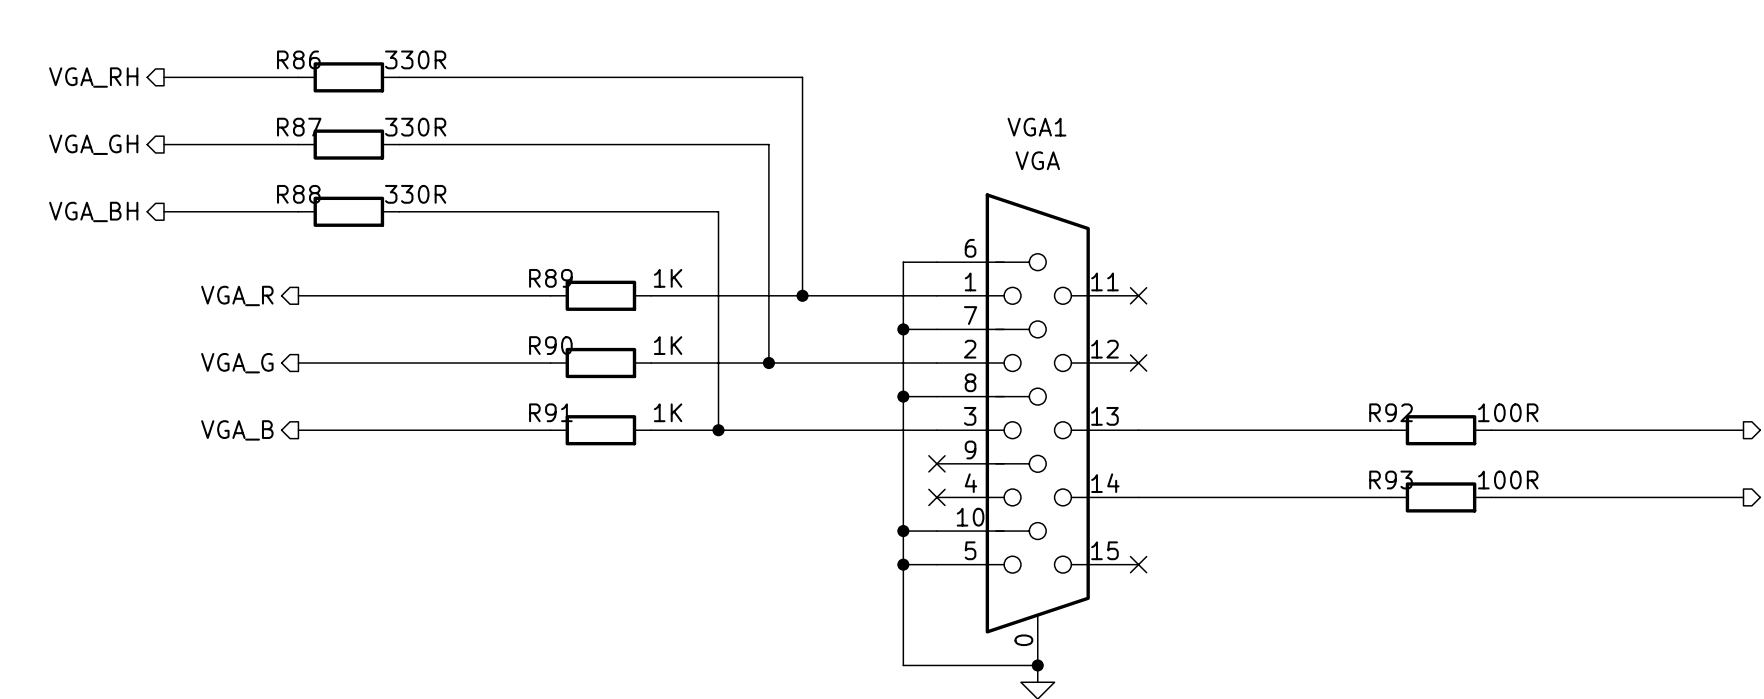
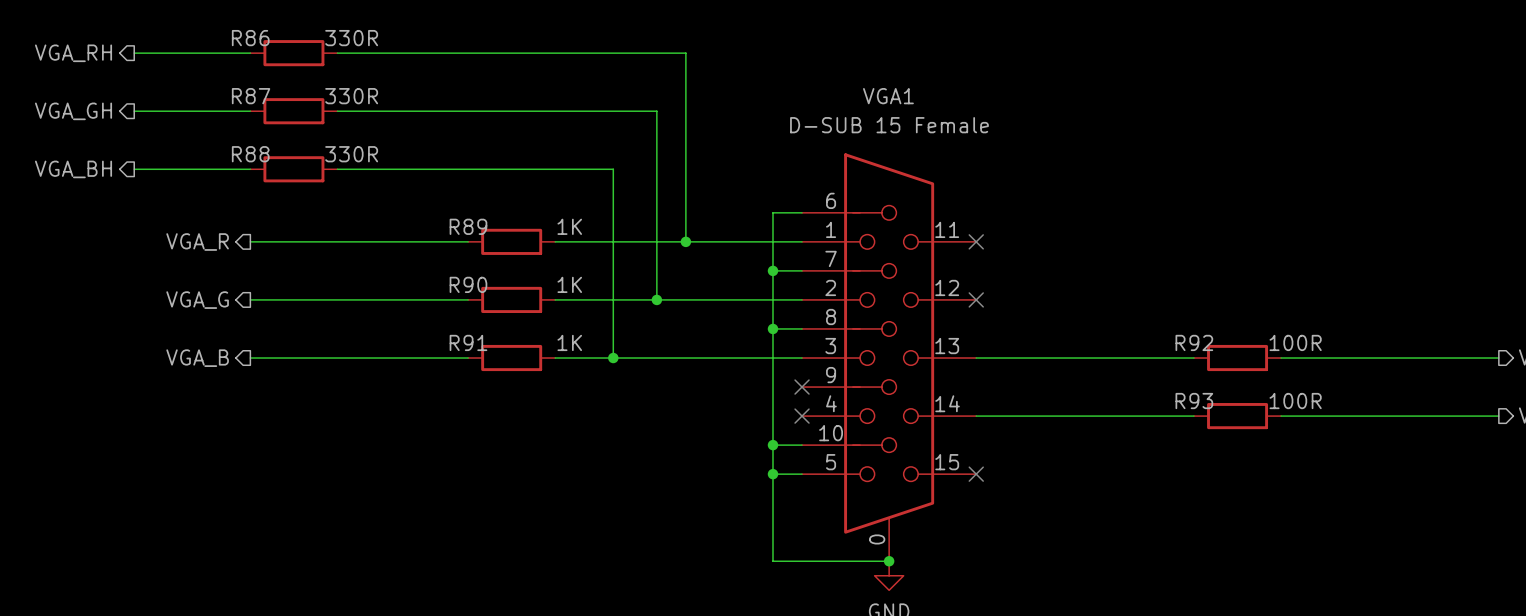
VGA1 value: VGA (1037, 160) -> D-SUB 15 Female (889, 125)

